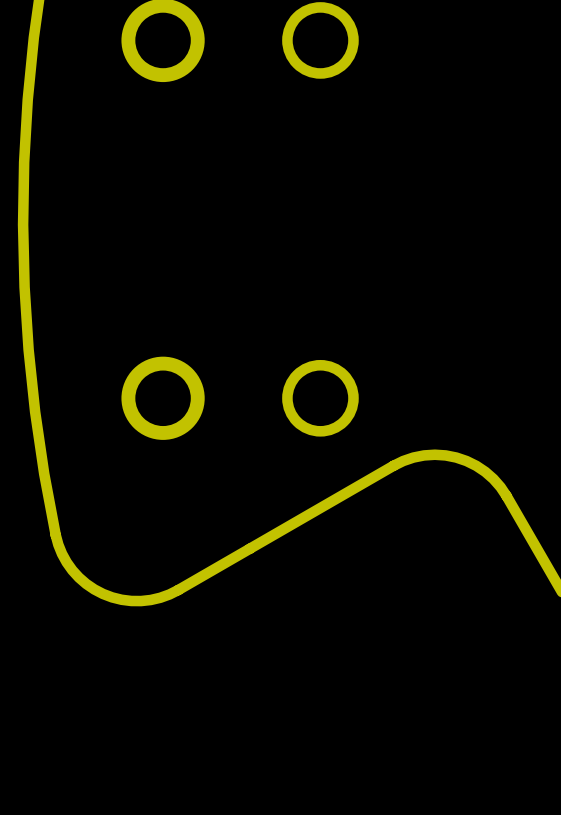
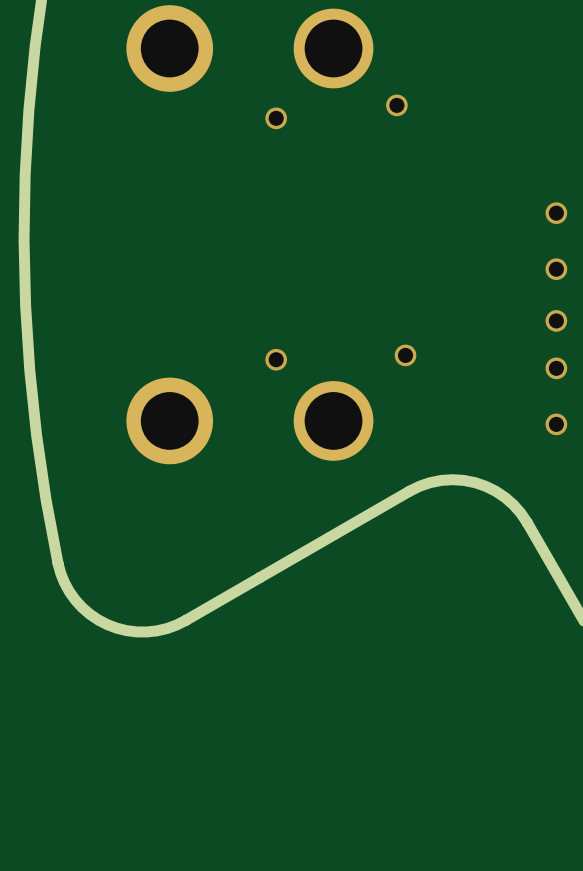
via: none -> (396, 105)
via: none -> (276, 118)
via: none -> (556, 213)
via: none -> (556, 269)
via: none -> (556, 320)
via: none -> (405, 355)
via: none -> (276, 359)
via: none -> (556, 368)
via: none -> (556, 424)

